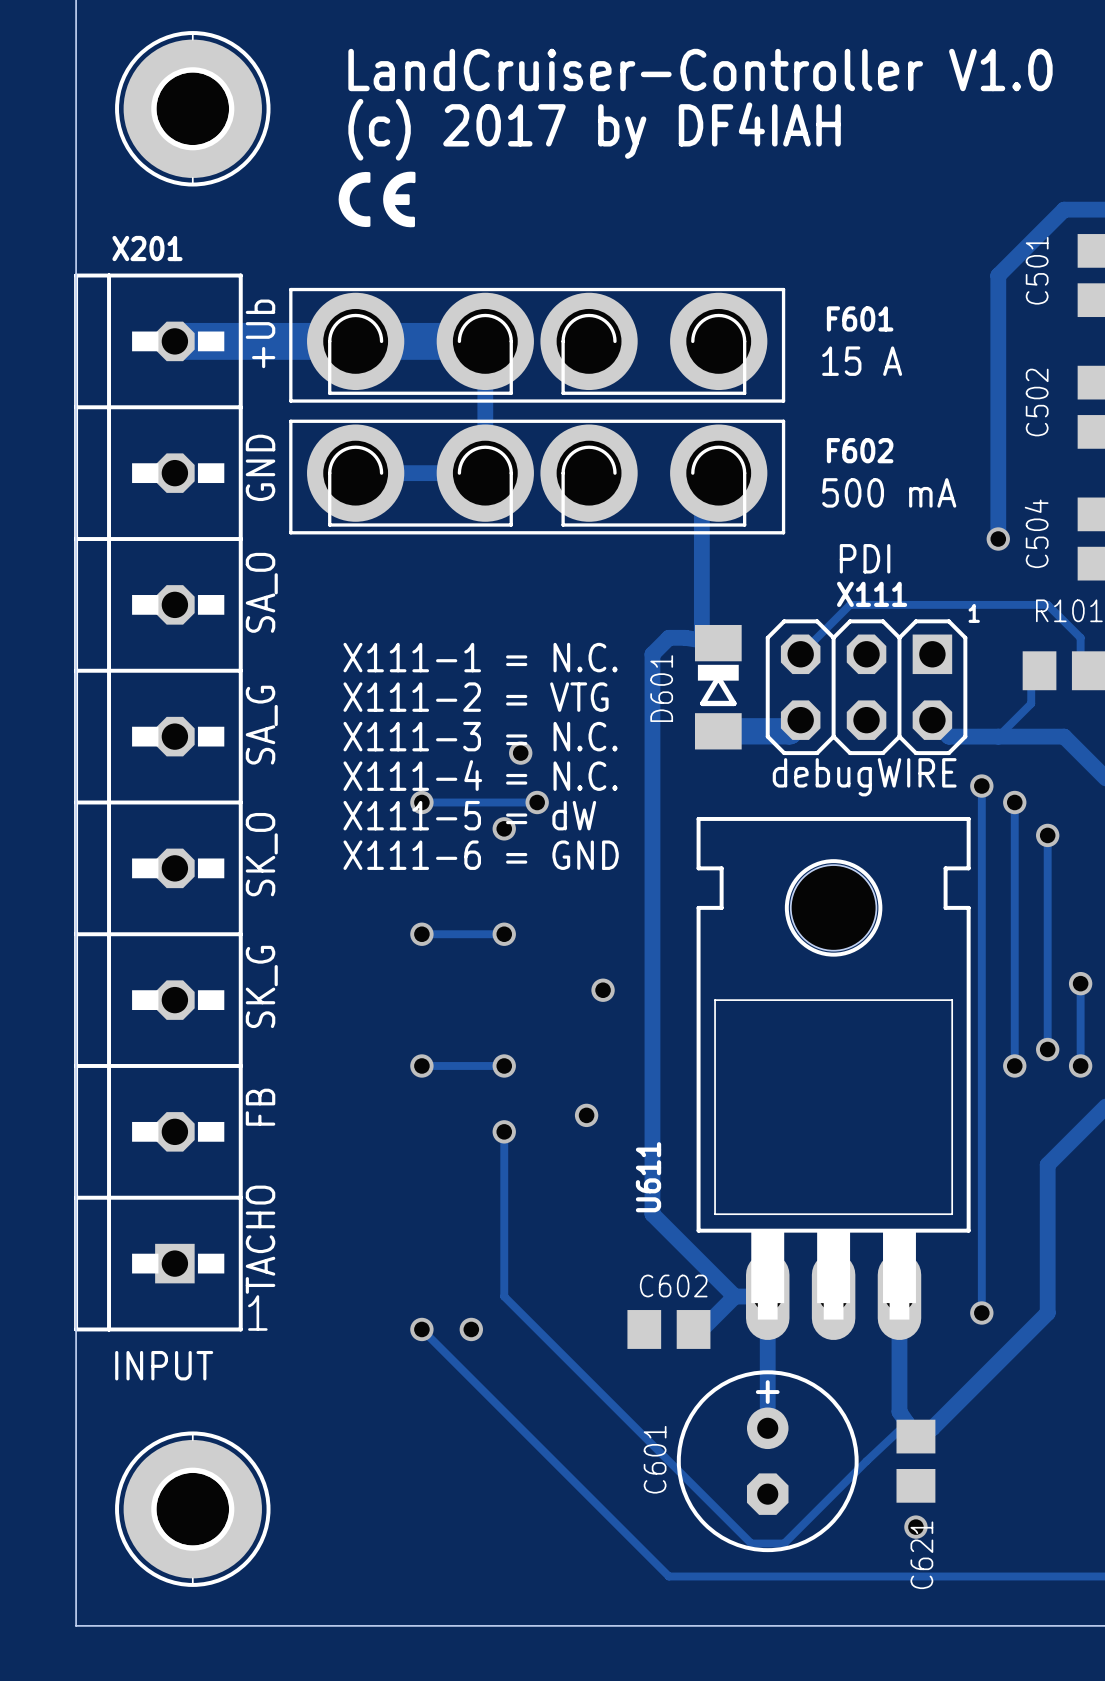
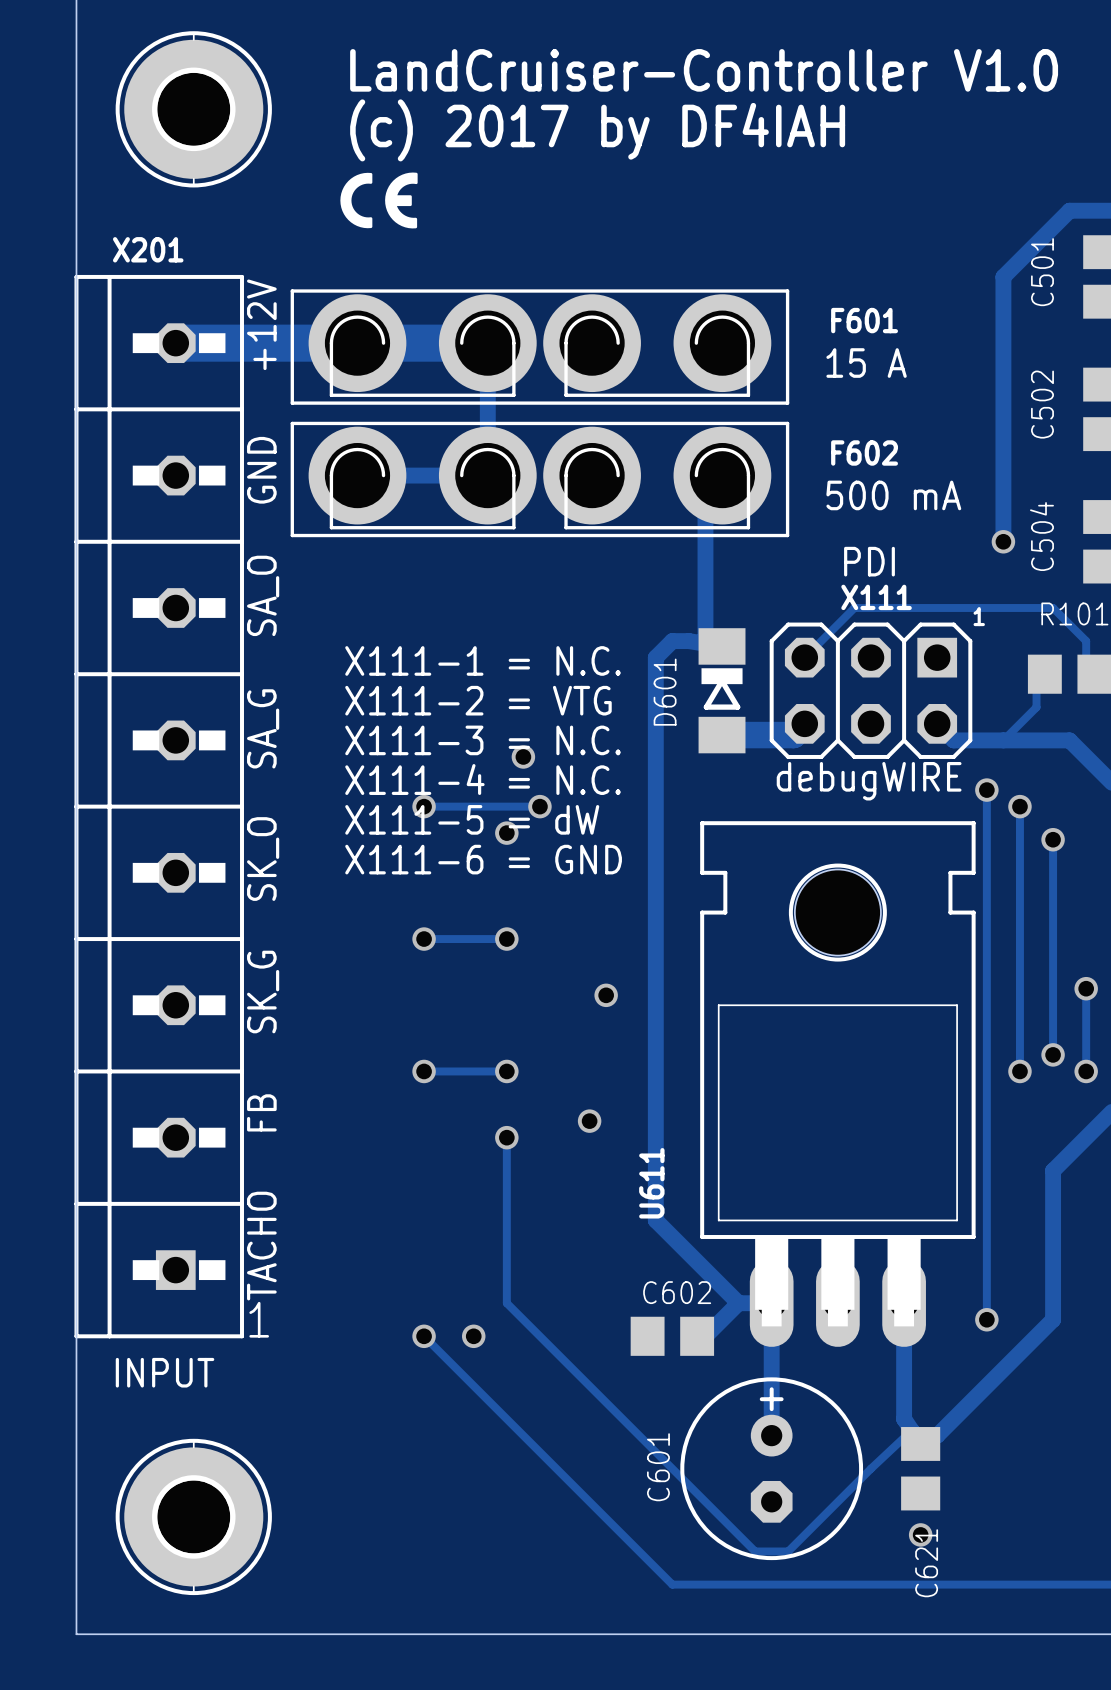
text: +Ub (260, 333) -> +12V (261, 324)

